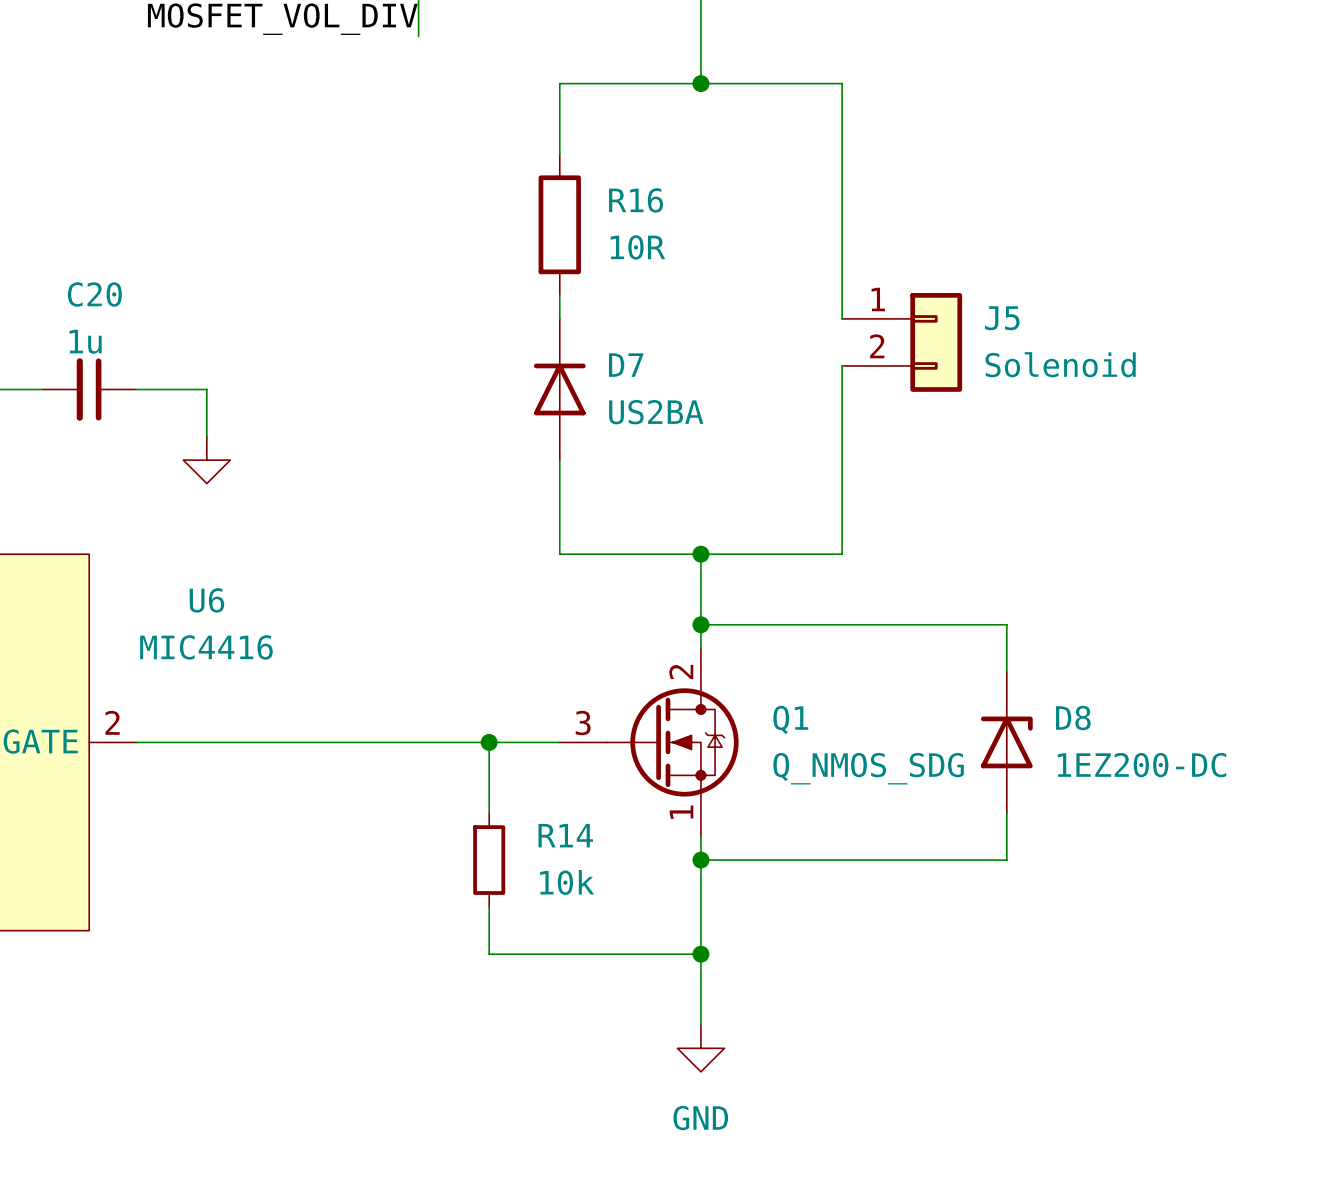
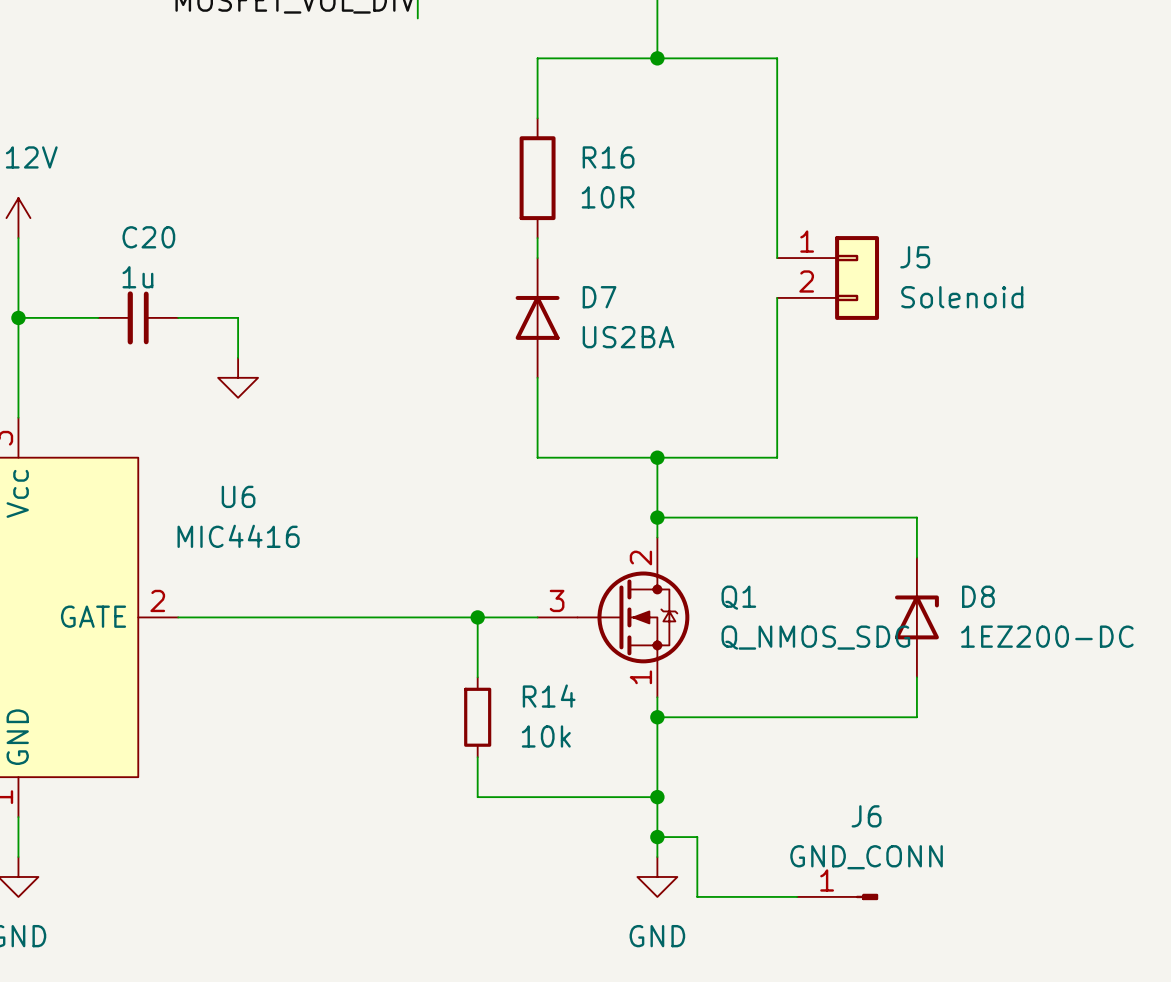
wire: none -> (657, 837) (697, 837) (697, 896) (797, 896)
junction: none -> (657, 837)
J6: none -> GND_CONN (837, 896)

